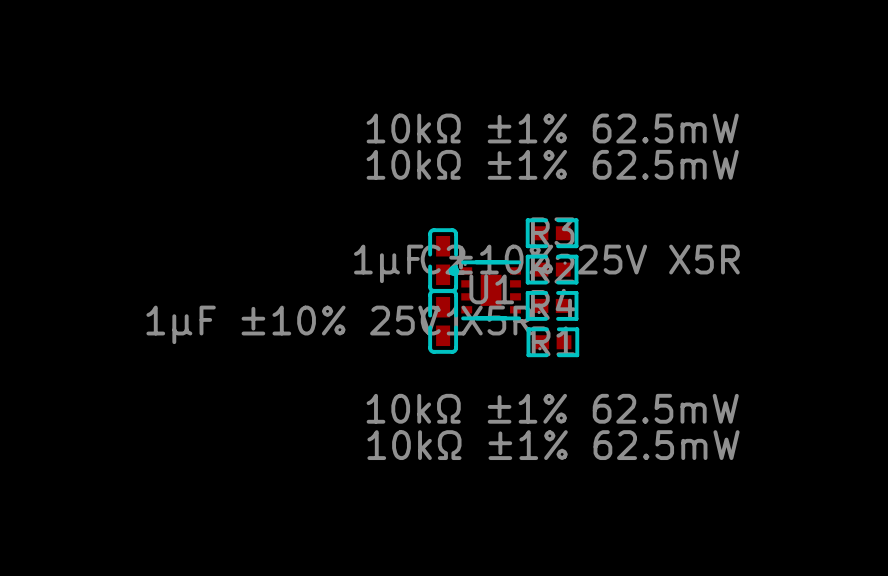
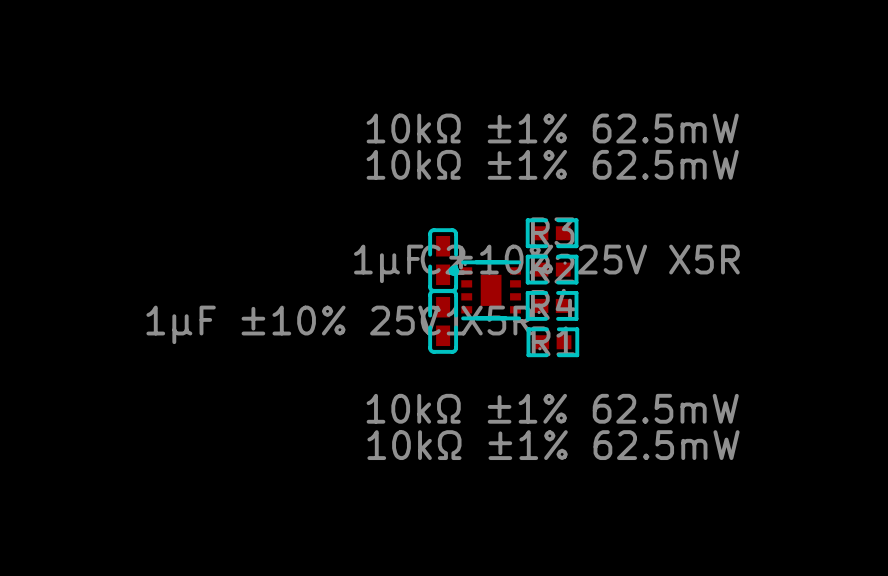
U1 name: U1 (491, 289) -> none

